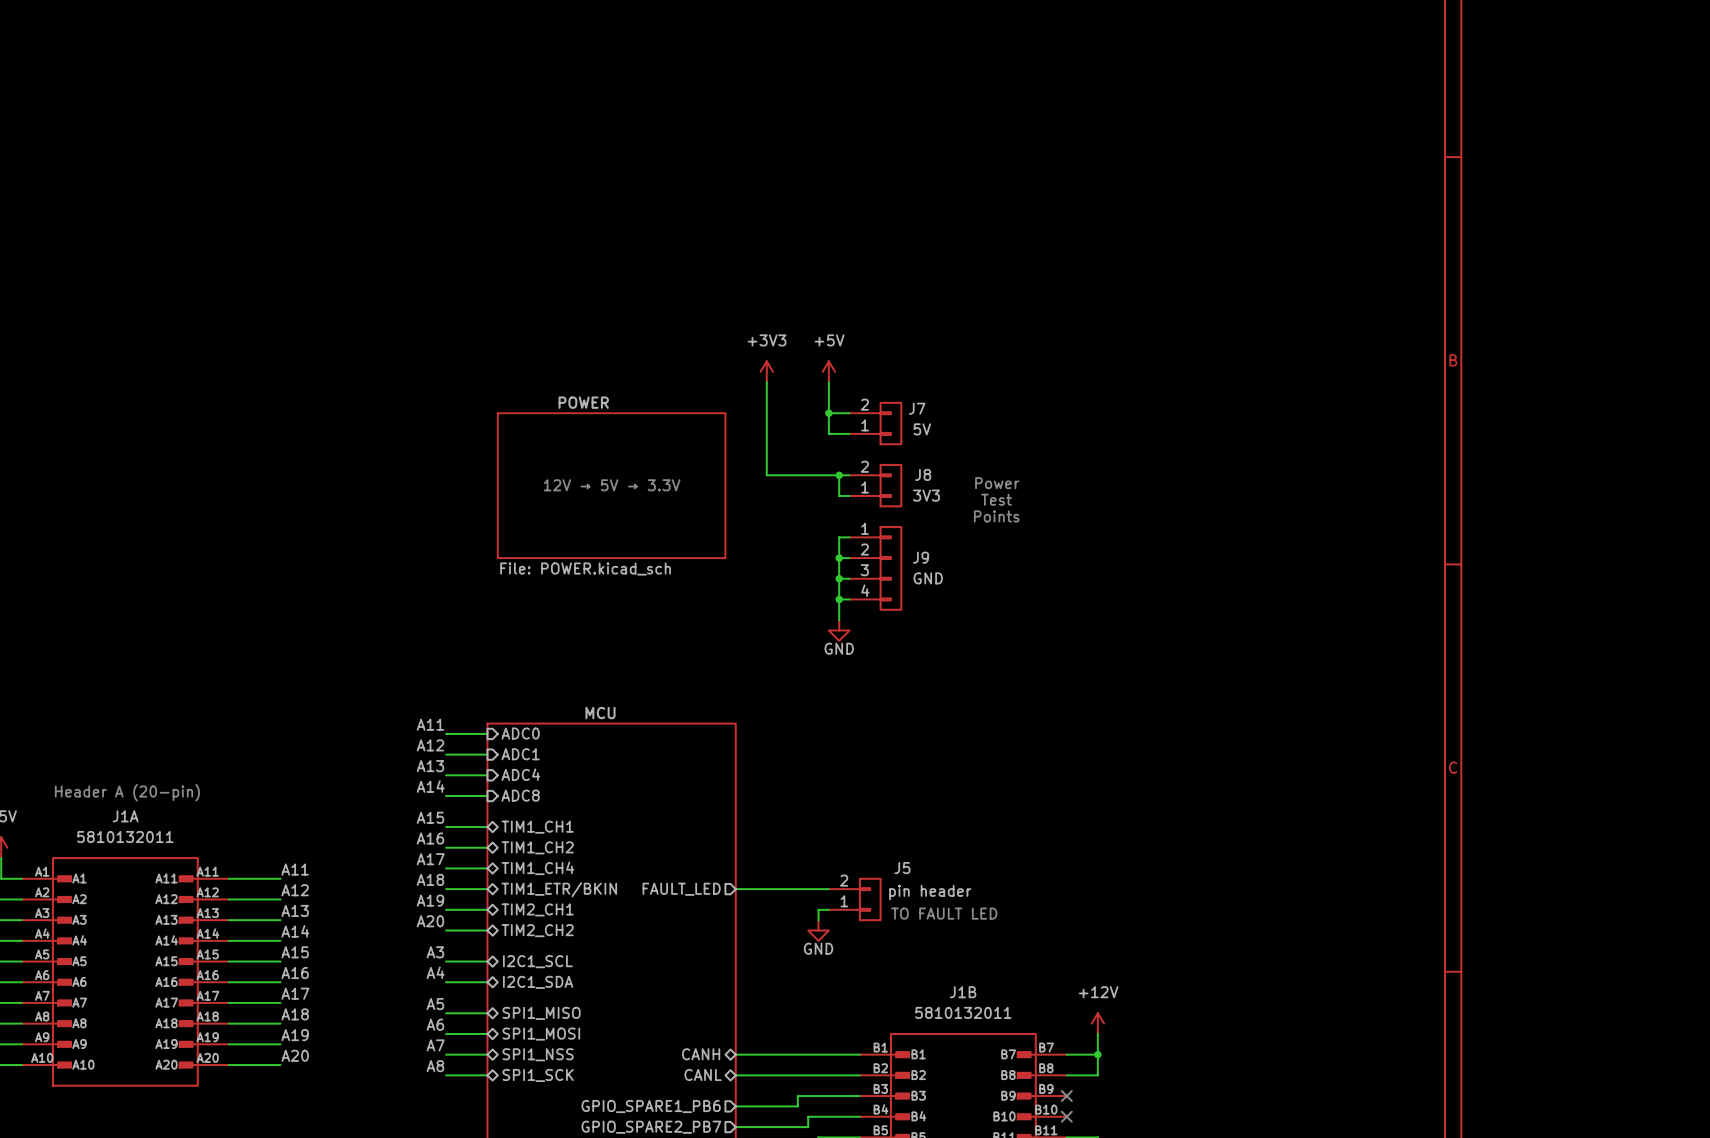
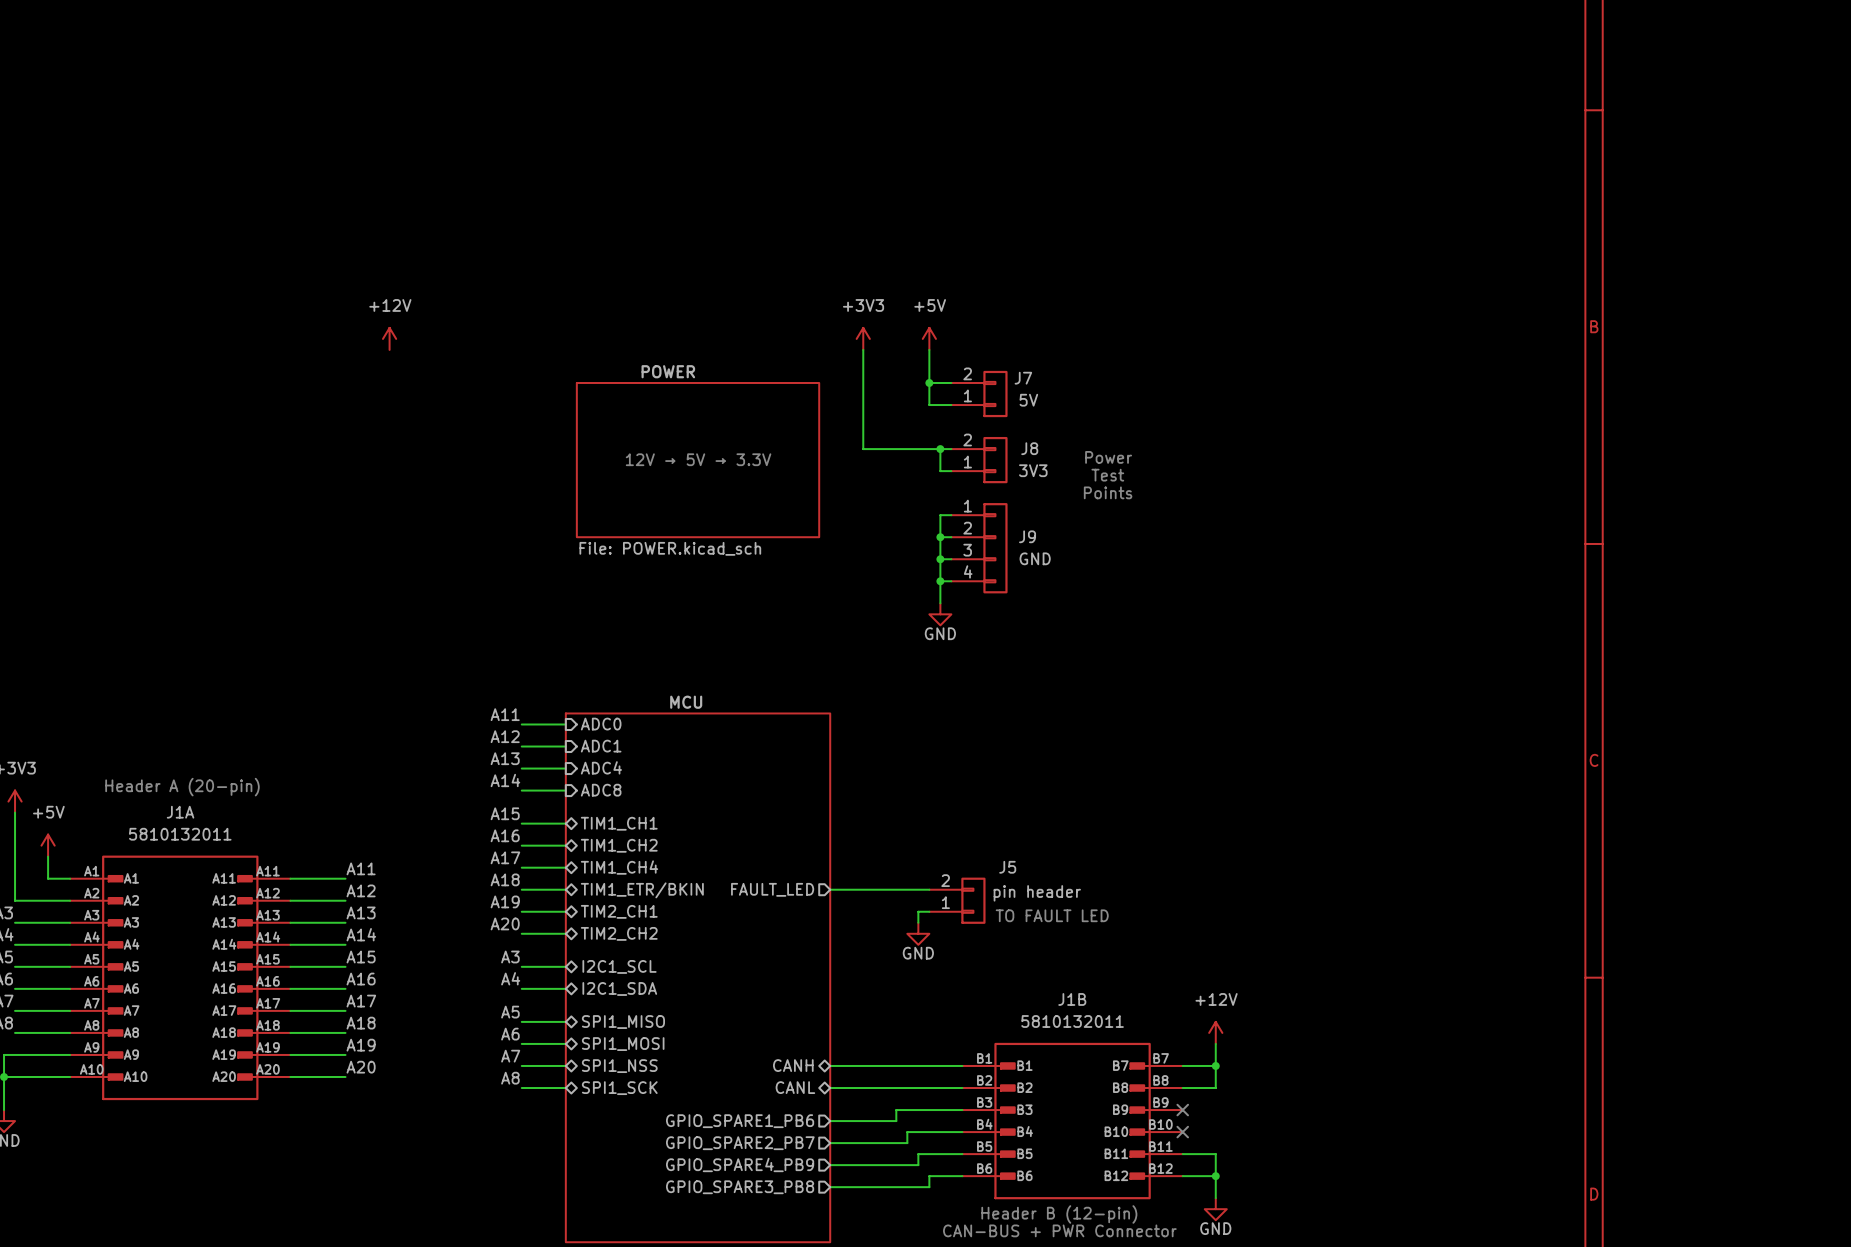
power symbol: none -> +12V (389, 338)

